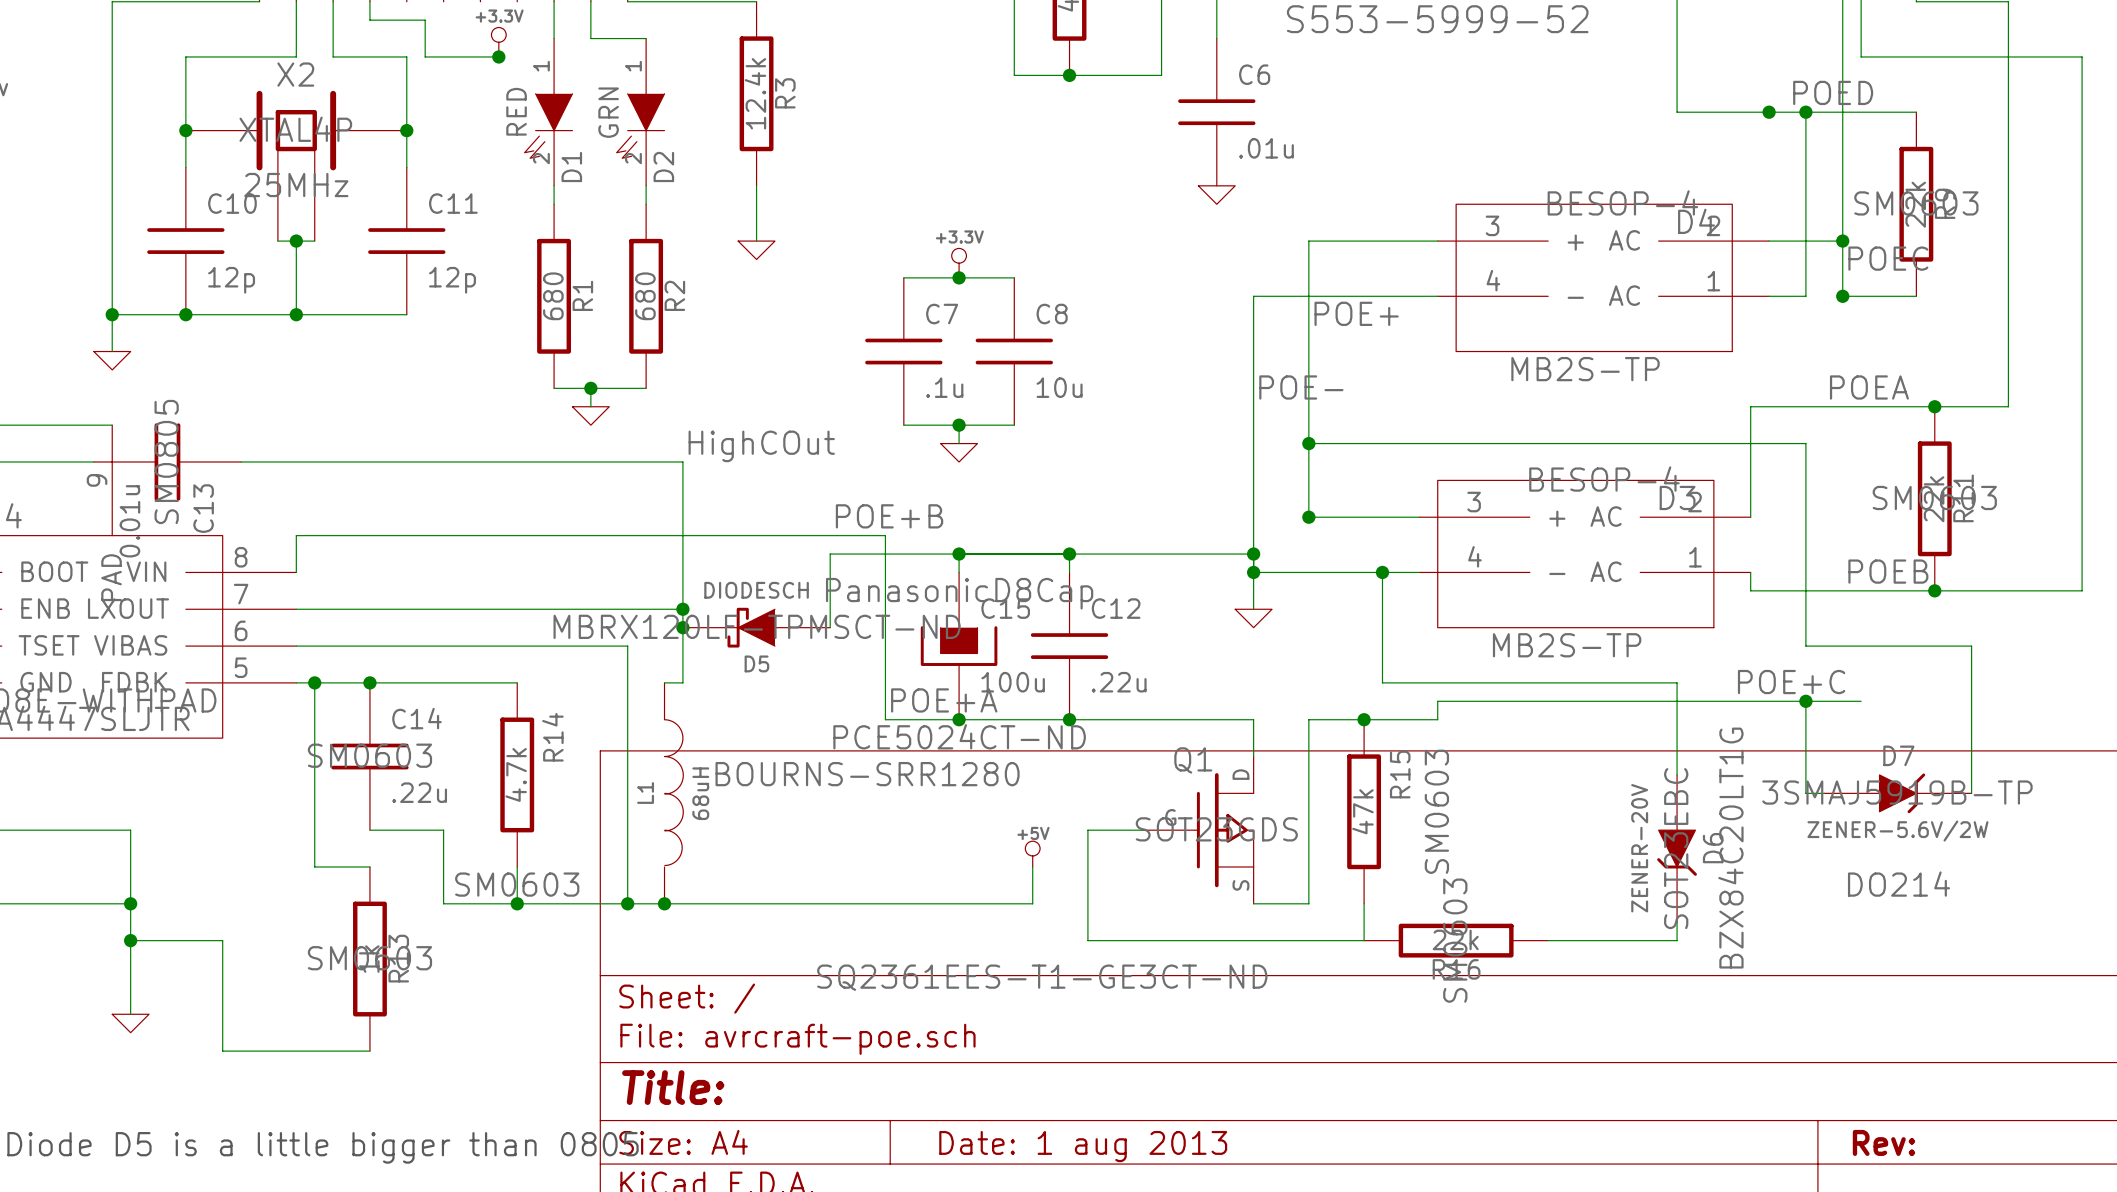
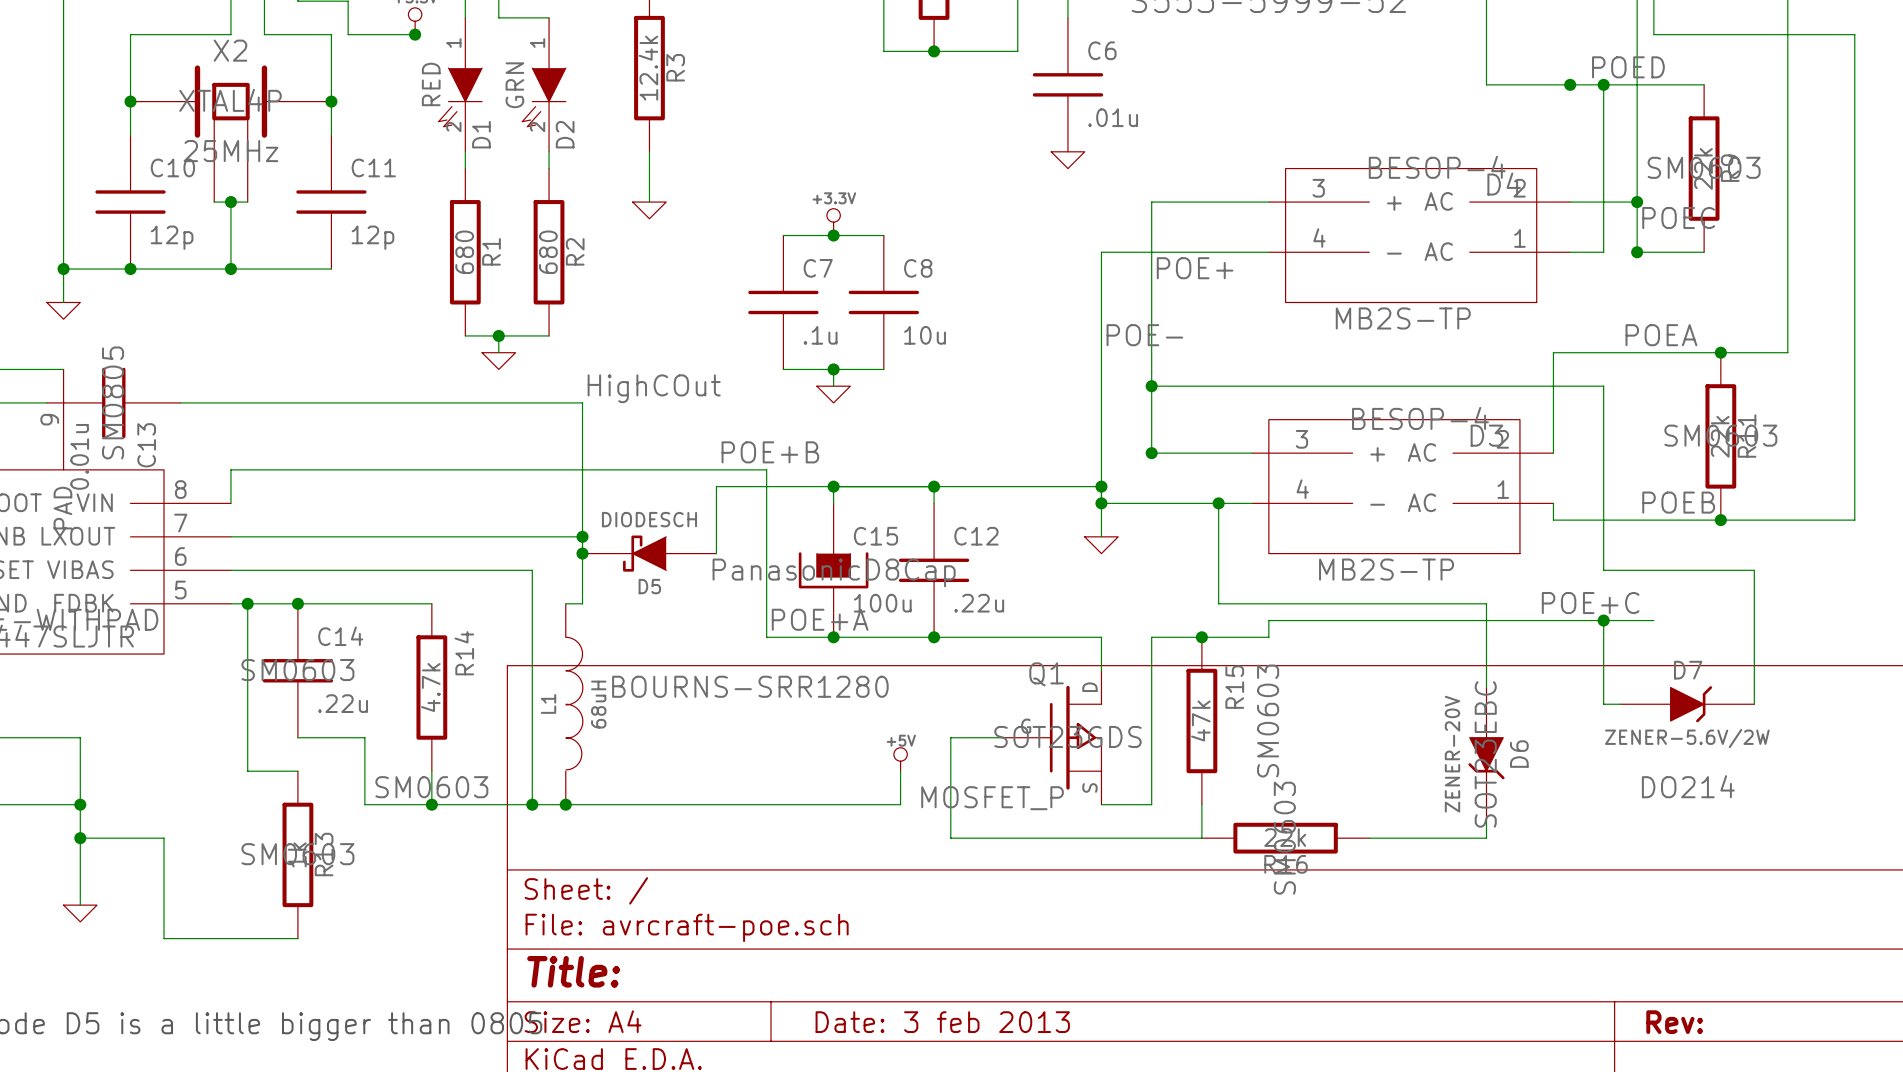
C15 text position: PanasonicD8Cap (959, 593) -> PanasonicD8Cap (834, 572)
D5 text: MBRX120LF-TPMSCT-ND (757, 626) -> none
C15 text: PCE5024CT-ND (959, 736) -> none
D7 text: 3SMAJ5919B-TP (1897, 792) -> none
D6 text: BZX84C20LT1G (1730, 848) -> none
Q1 value: SQ2361EES-T1-GE3CT-ND (1042, 977) -> MOSFET_P (992, 798)
title block: Date: 1 aug 2013 (1083, 1146) -> Date: 3 feb 2013 (942, 1022)

